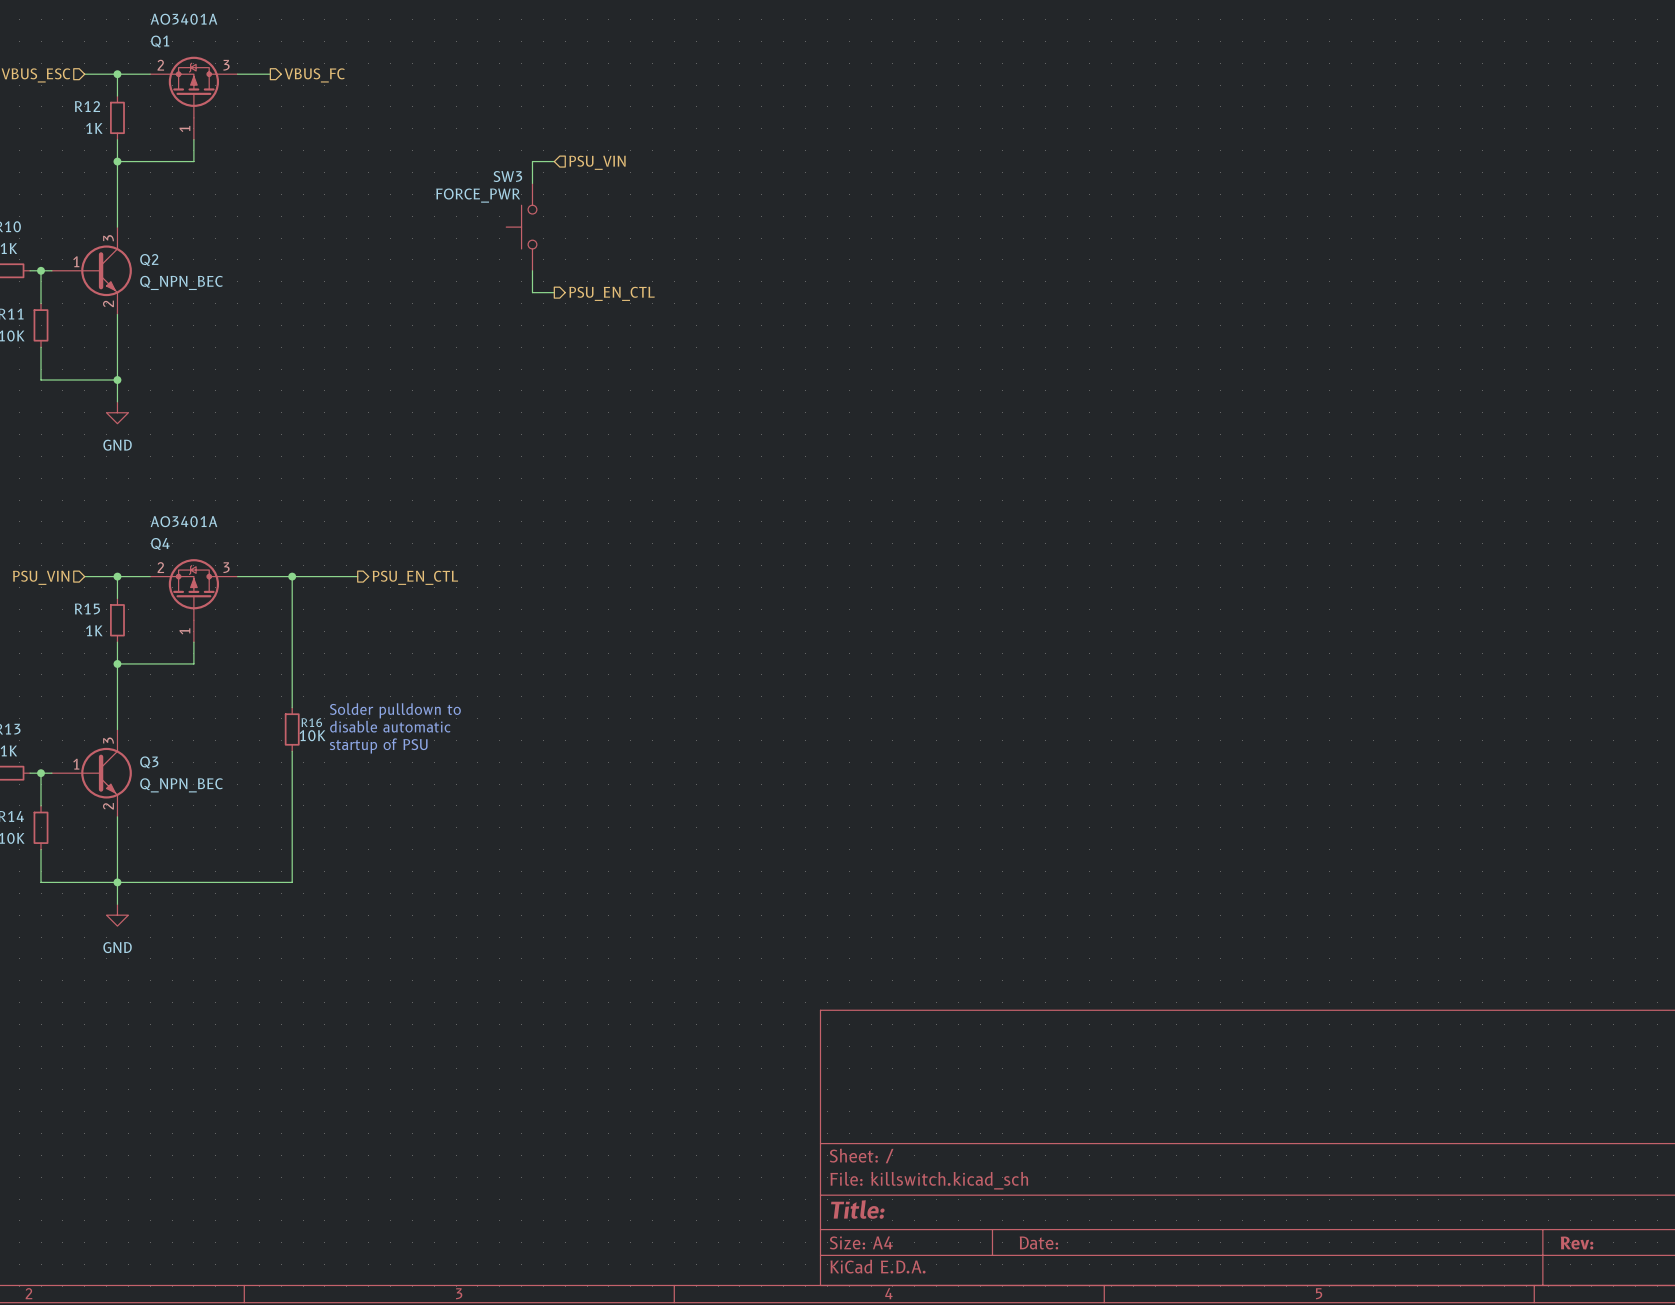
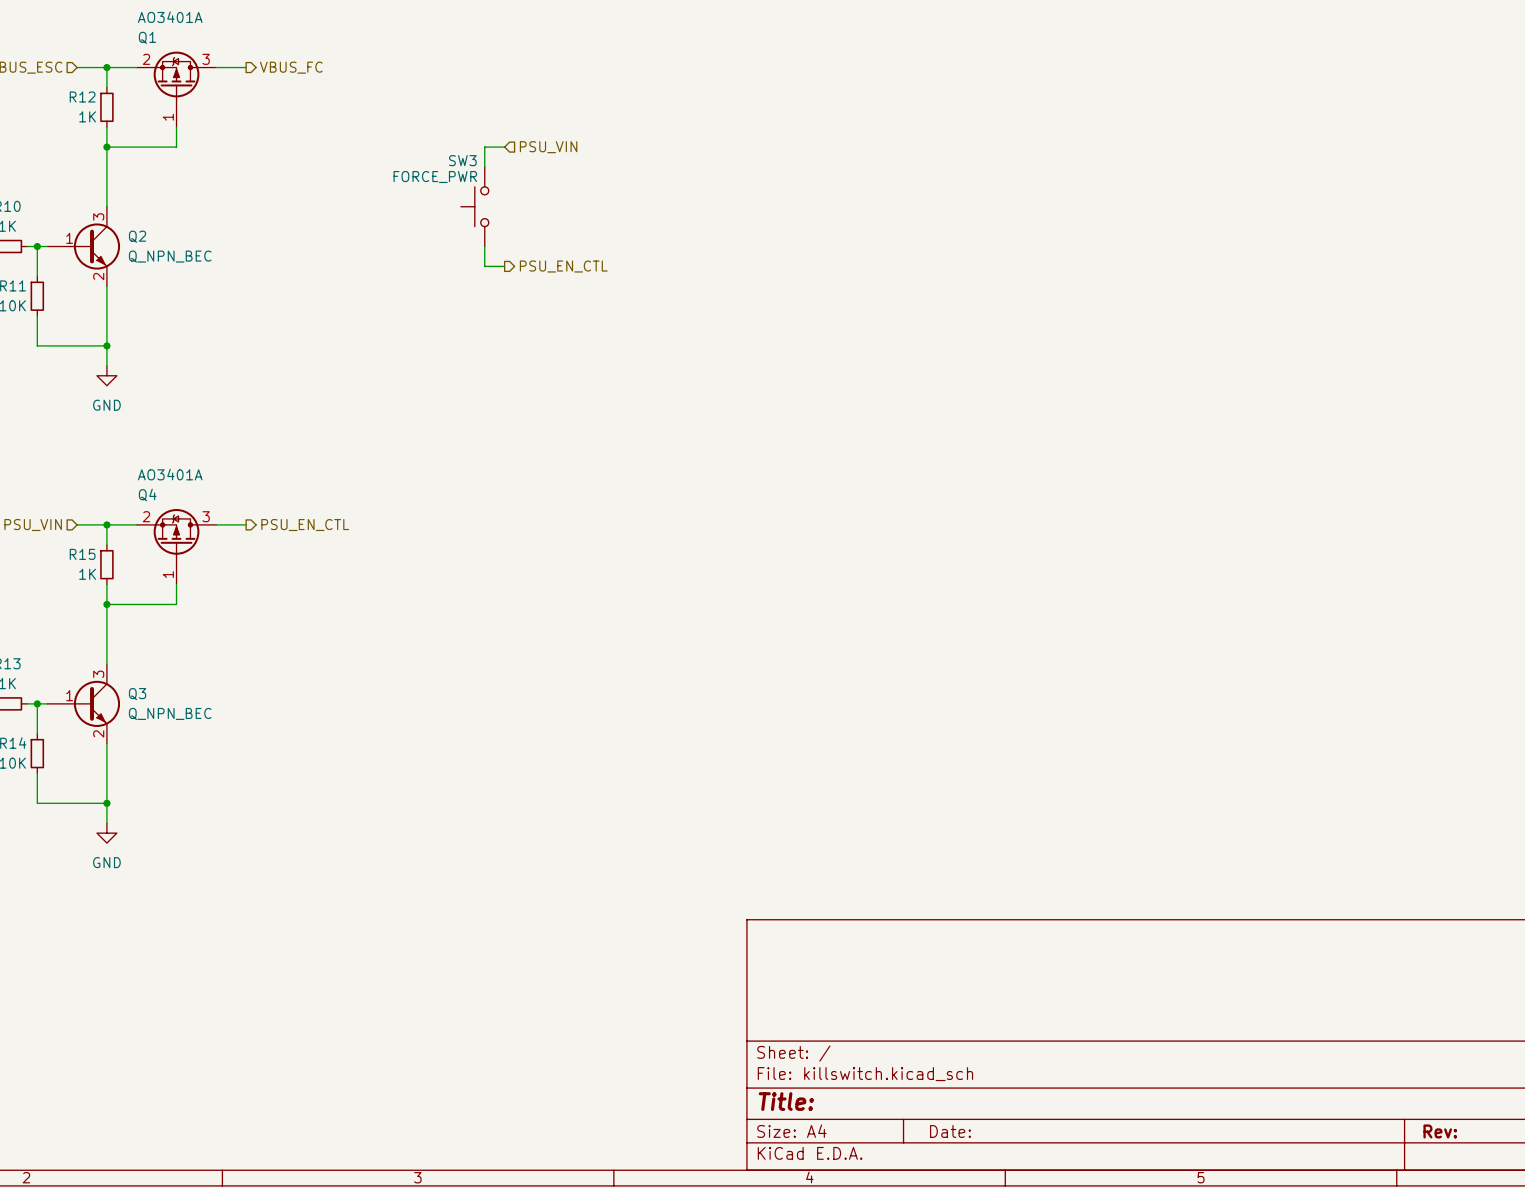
wire: (270, 576) (357, 576) -> none
wire: (292, 576) (292, 707) -> none
junction: (292, 576) -> none
hierarchical label position: PSU_EN_CTL (415, 577) -> PSU_EN_CTL (305, 525)
text: Solder pulldown to (395, 710) -> none
text: disable automatic (390, 726) -> none
R16: 10K (292, 729) -> none
text: startup of PSU (378, 745) -> none
wire: (292, 751) (292, 882) (117, 882) -> none

